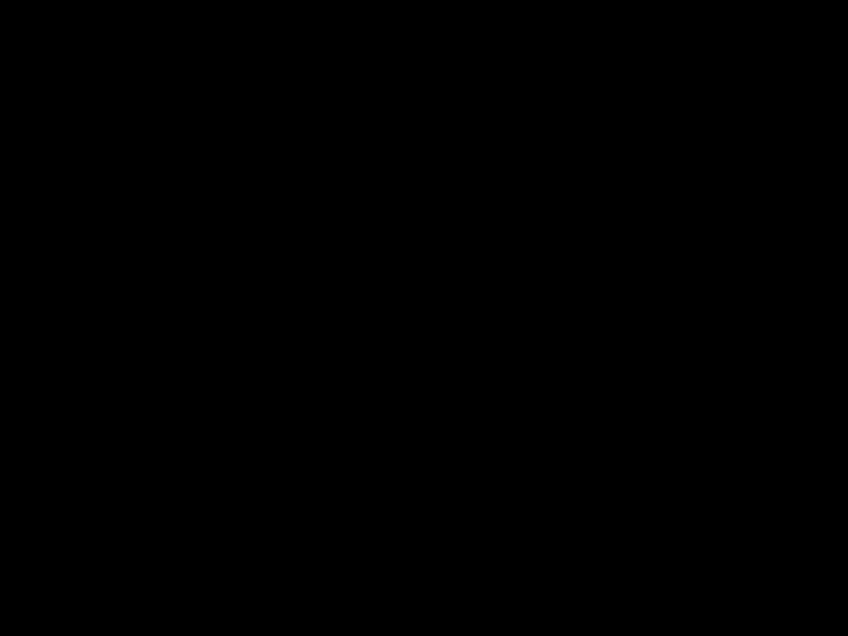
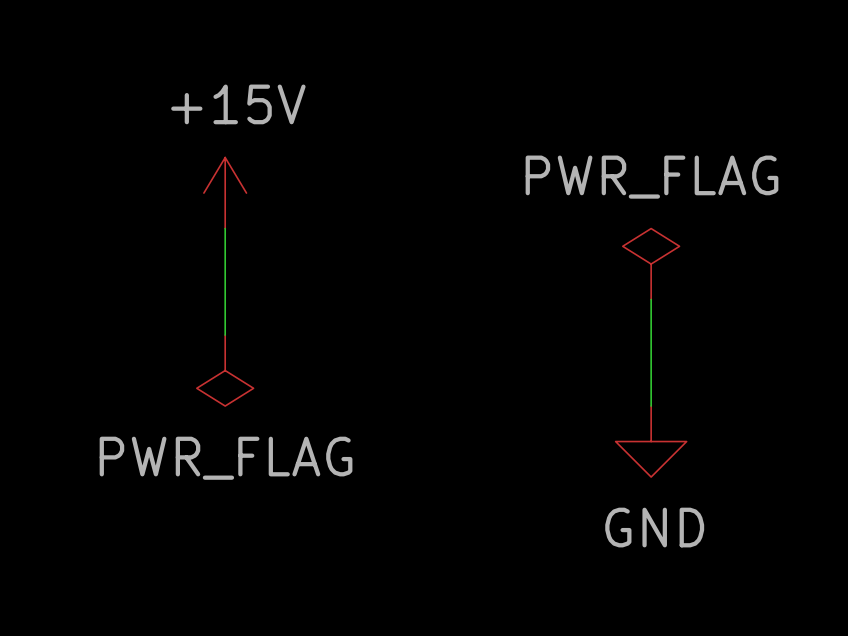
power symbol: none -> +15V (225, 193)
wire: none -> (225, 228) (225, 335)
power symbol: none -> PWR_FLAG (651, 264)
wire: none -> (651, 299) (651, 406)
power symbol: none -> PWR_FLAG (225, 370)
power symbol: none -> GND (651, 441)

